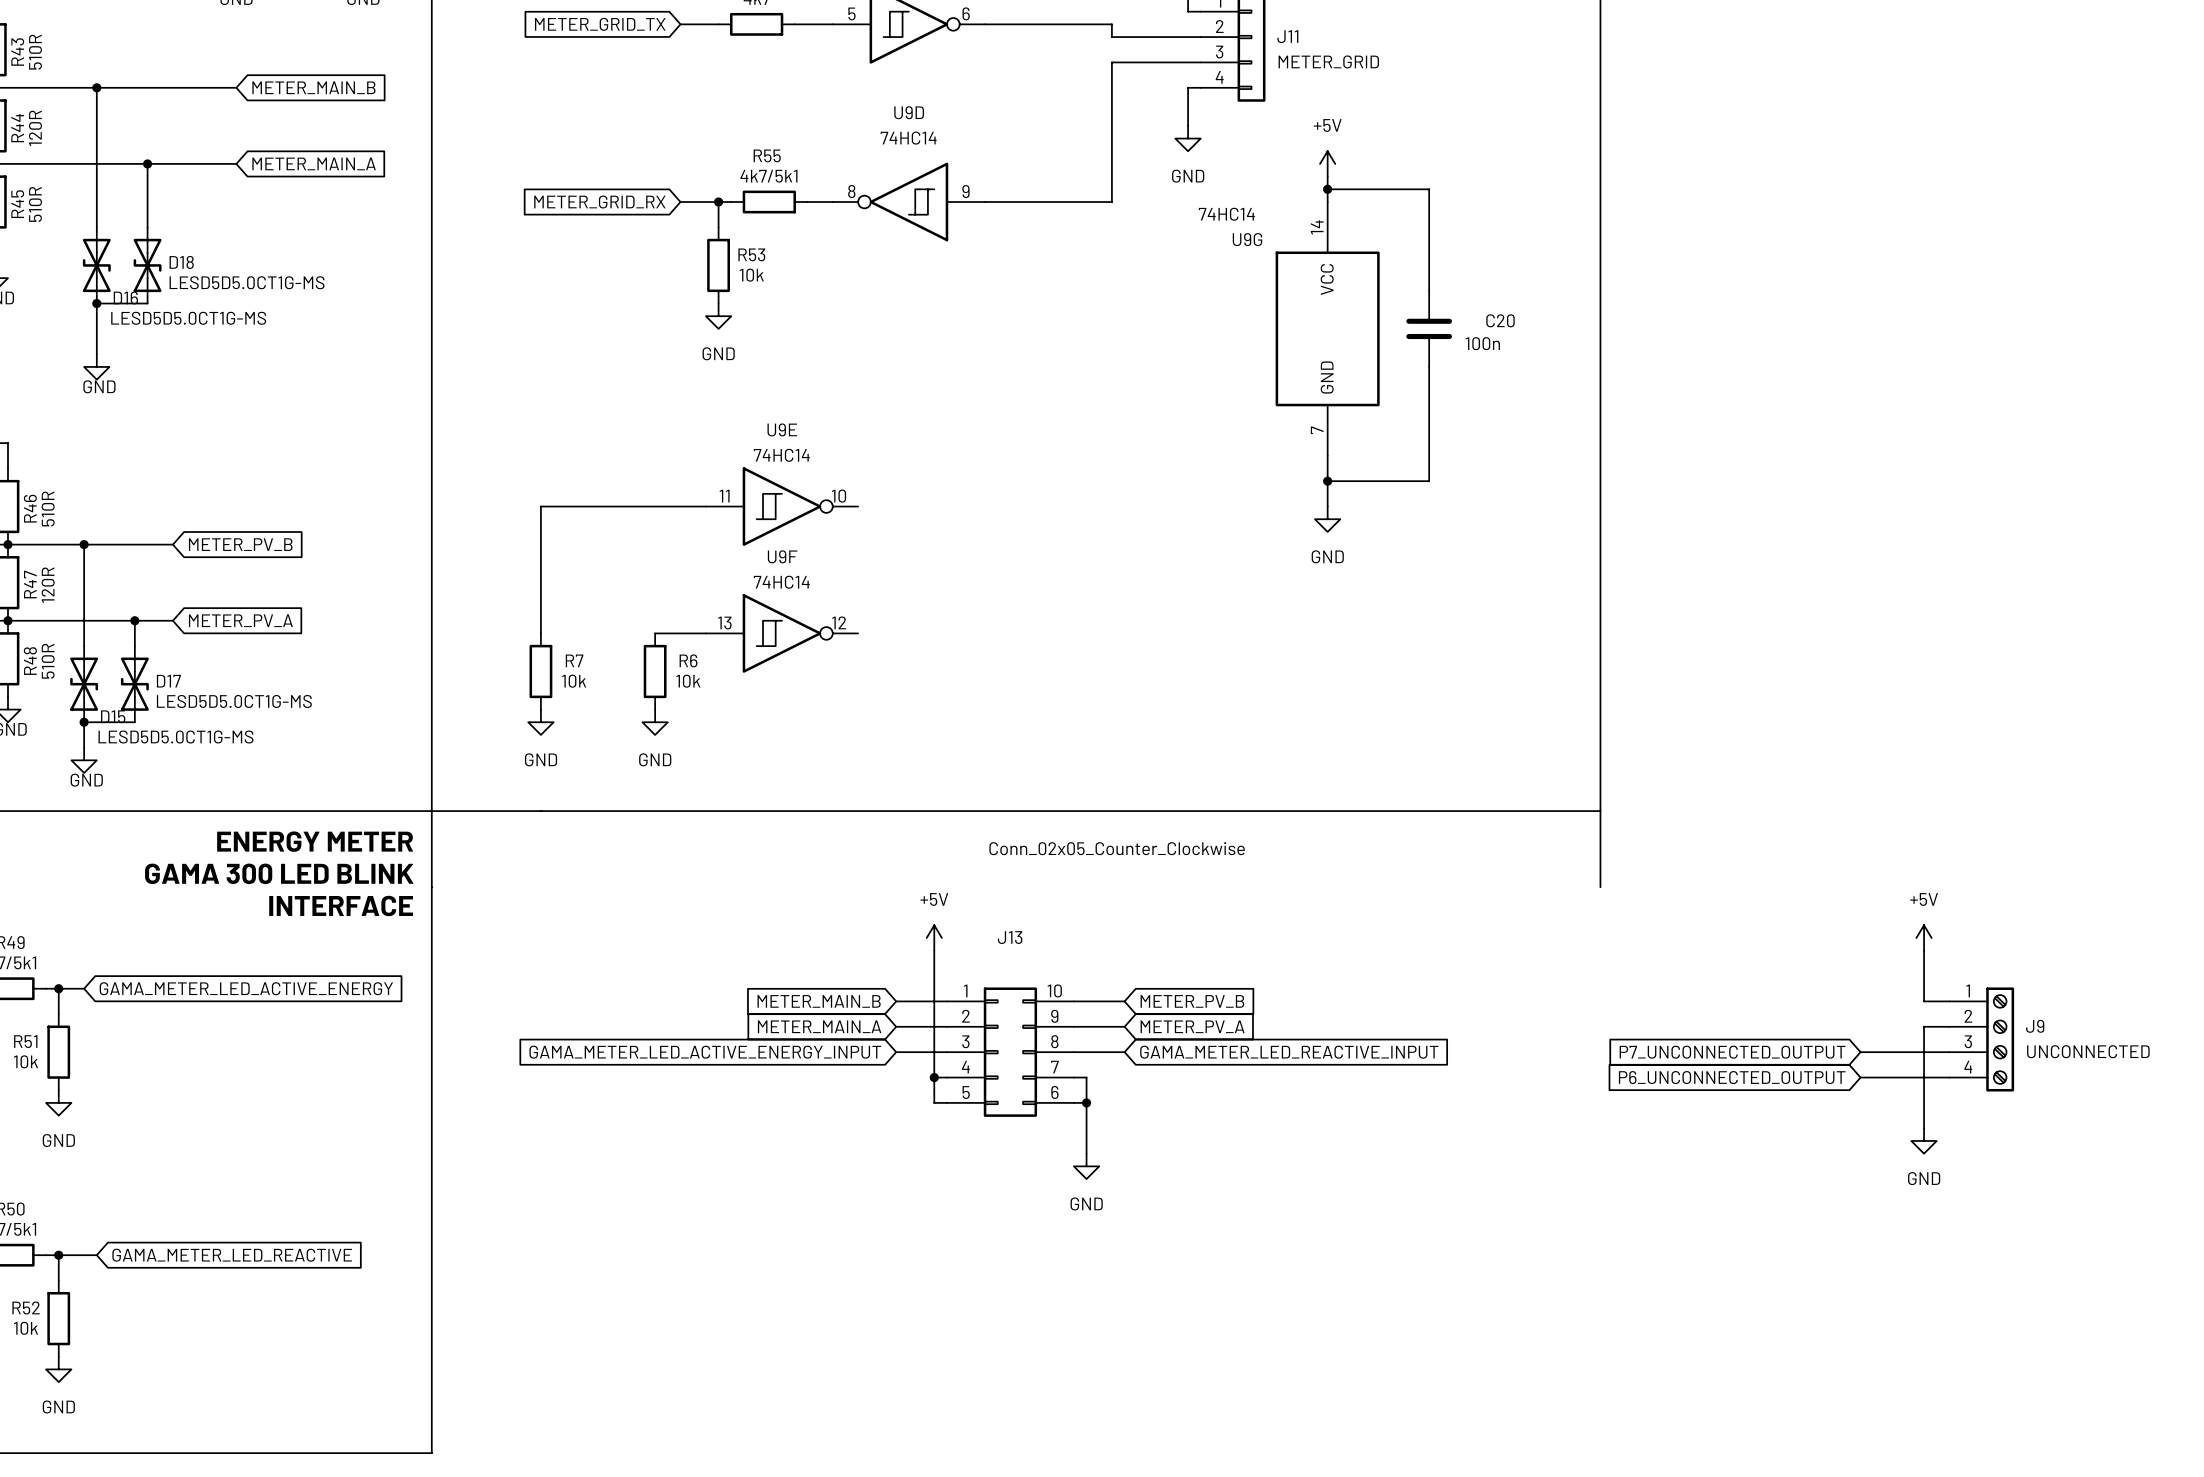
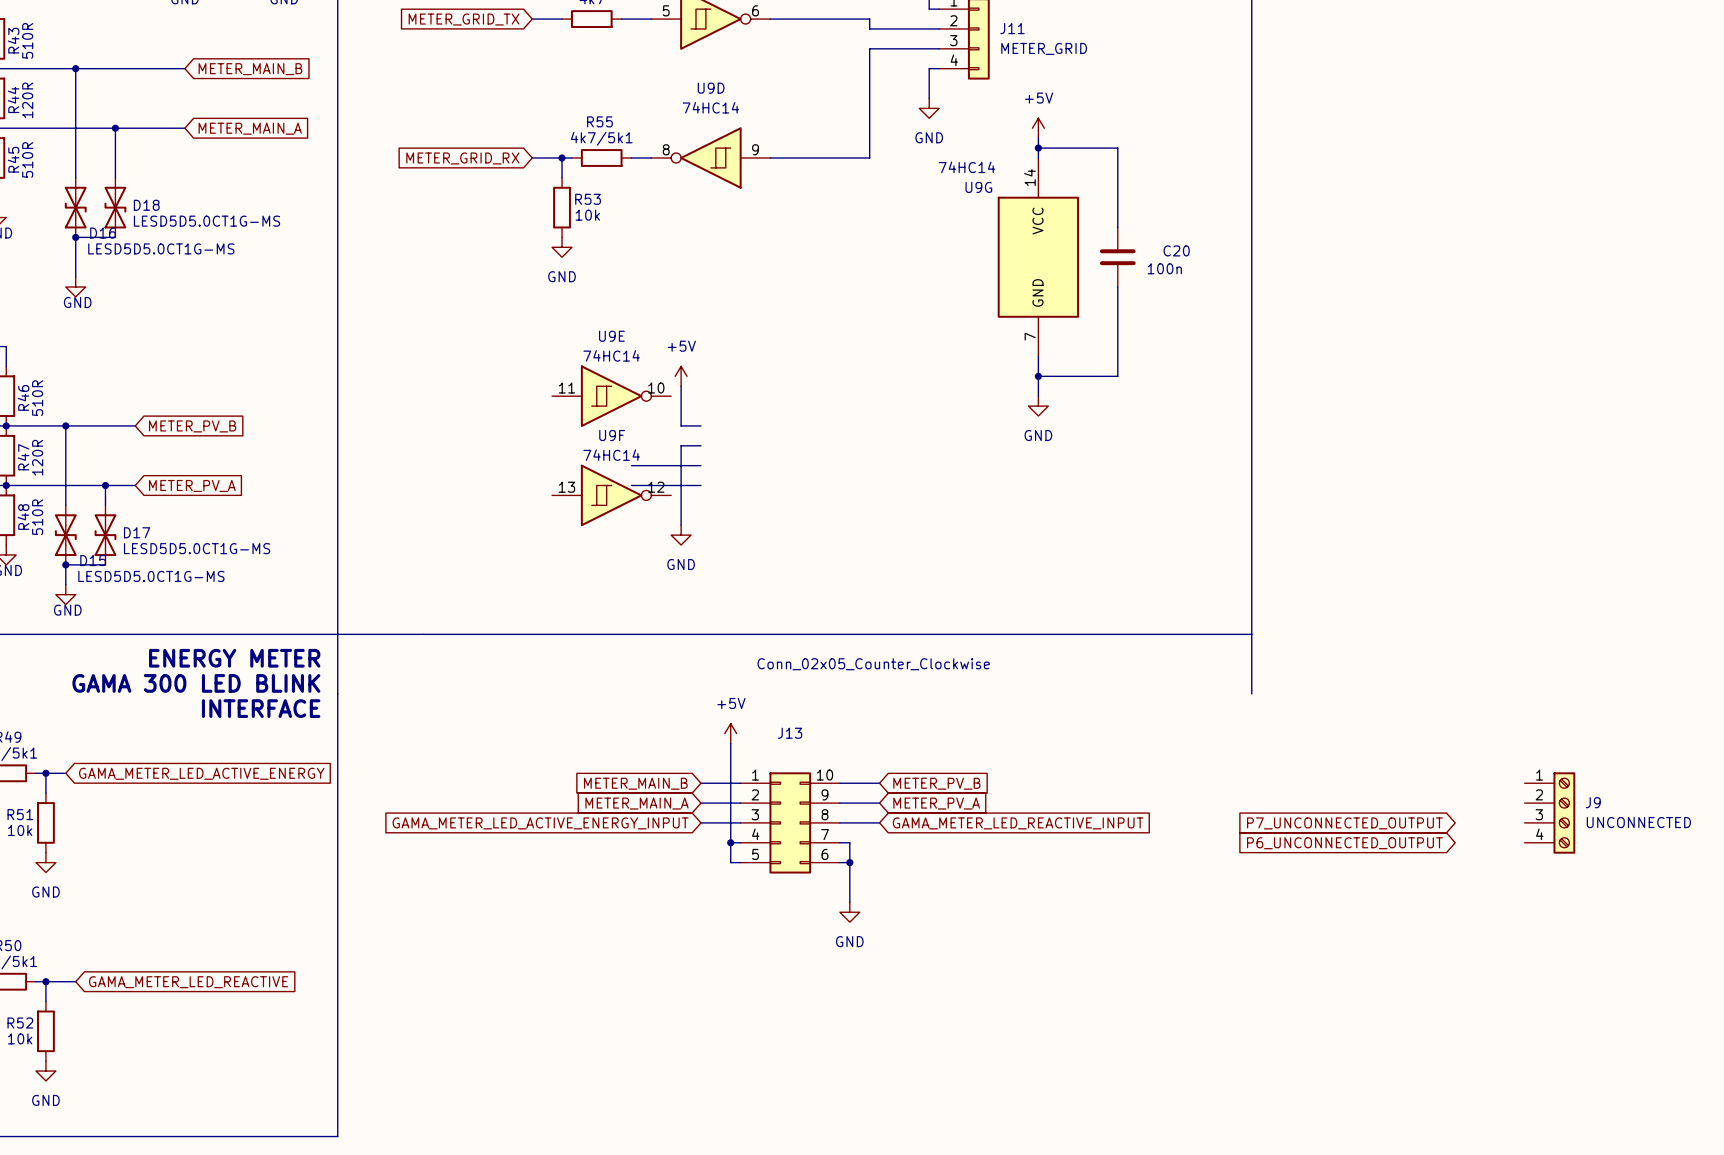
power symbol: none -> +5V (681, 376)
wire: none -> (681, 386) (681, 425) (700, 425)
wire: (705, 506) (540, 506) (540, 633) -> none
wire: none -> (700, 445) (681, 445) (681, 525)
wire: none -> (631, 465) (700, 465)
wire: none -> (631, 485) (700, 485)
wire: (655, 633) (705, 633) -> none
R7: 10k (540, 671) -> none
R6: 10k (655, 671) -> none
power symbol: none -> GND (681, 535)
power symbol: GND (540, 722) -> none
power symbol: GND (655, 722) -> none
power symbol: +5V (1924, 937) -> none
wire: (1924, 950) (1924, 1001) (1949, 1001) -> none
wire: (1949, 1026) (1924, 1026) (1924, 1128) -> none
wire: (1860, 1052) (1949, 1052) -> none
wire: (1860, 1077) (1949, 1077) -> none
power symbol: GND (1924, 1140) -> none

